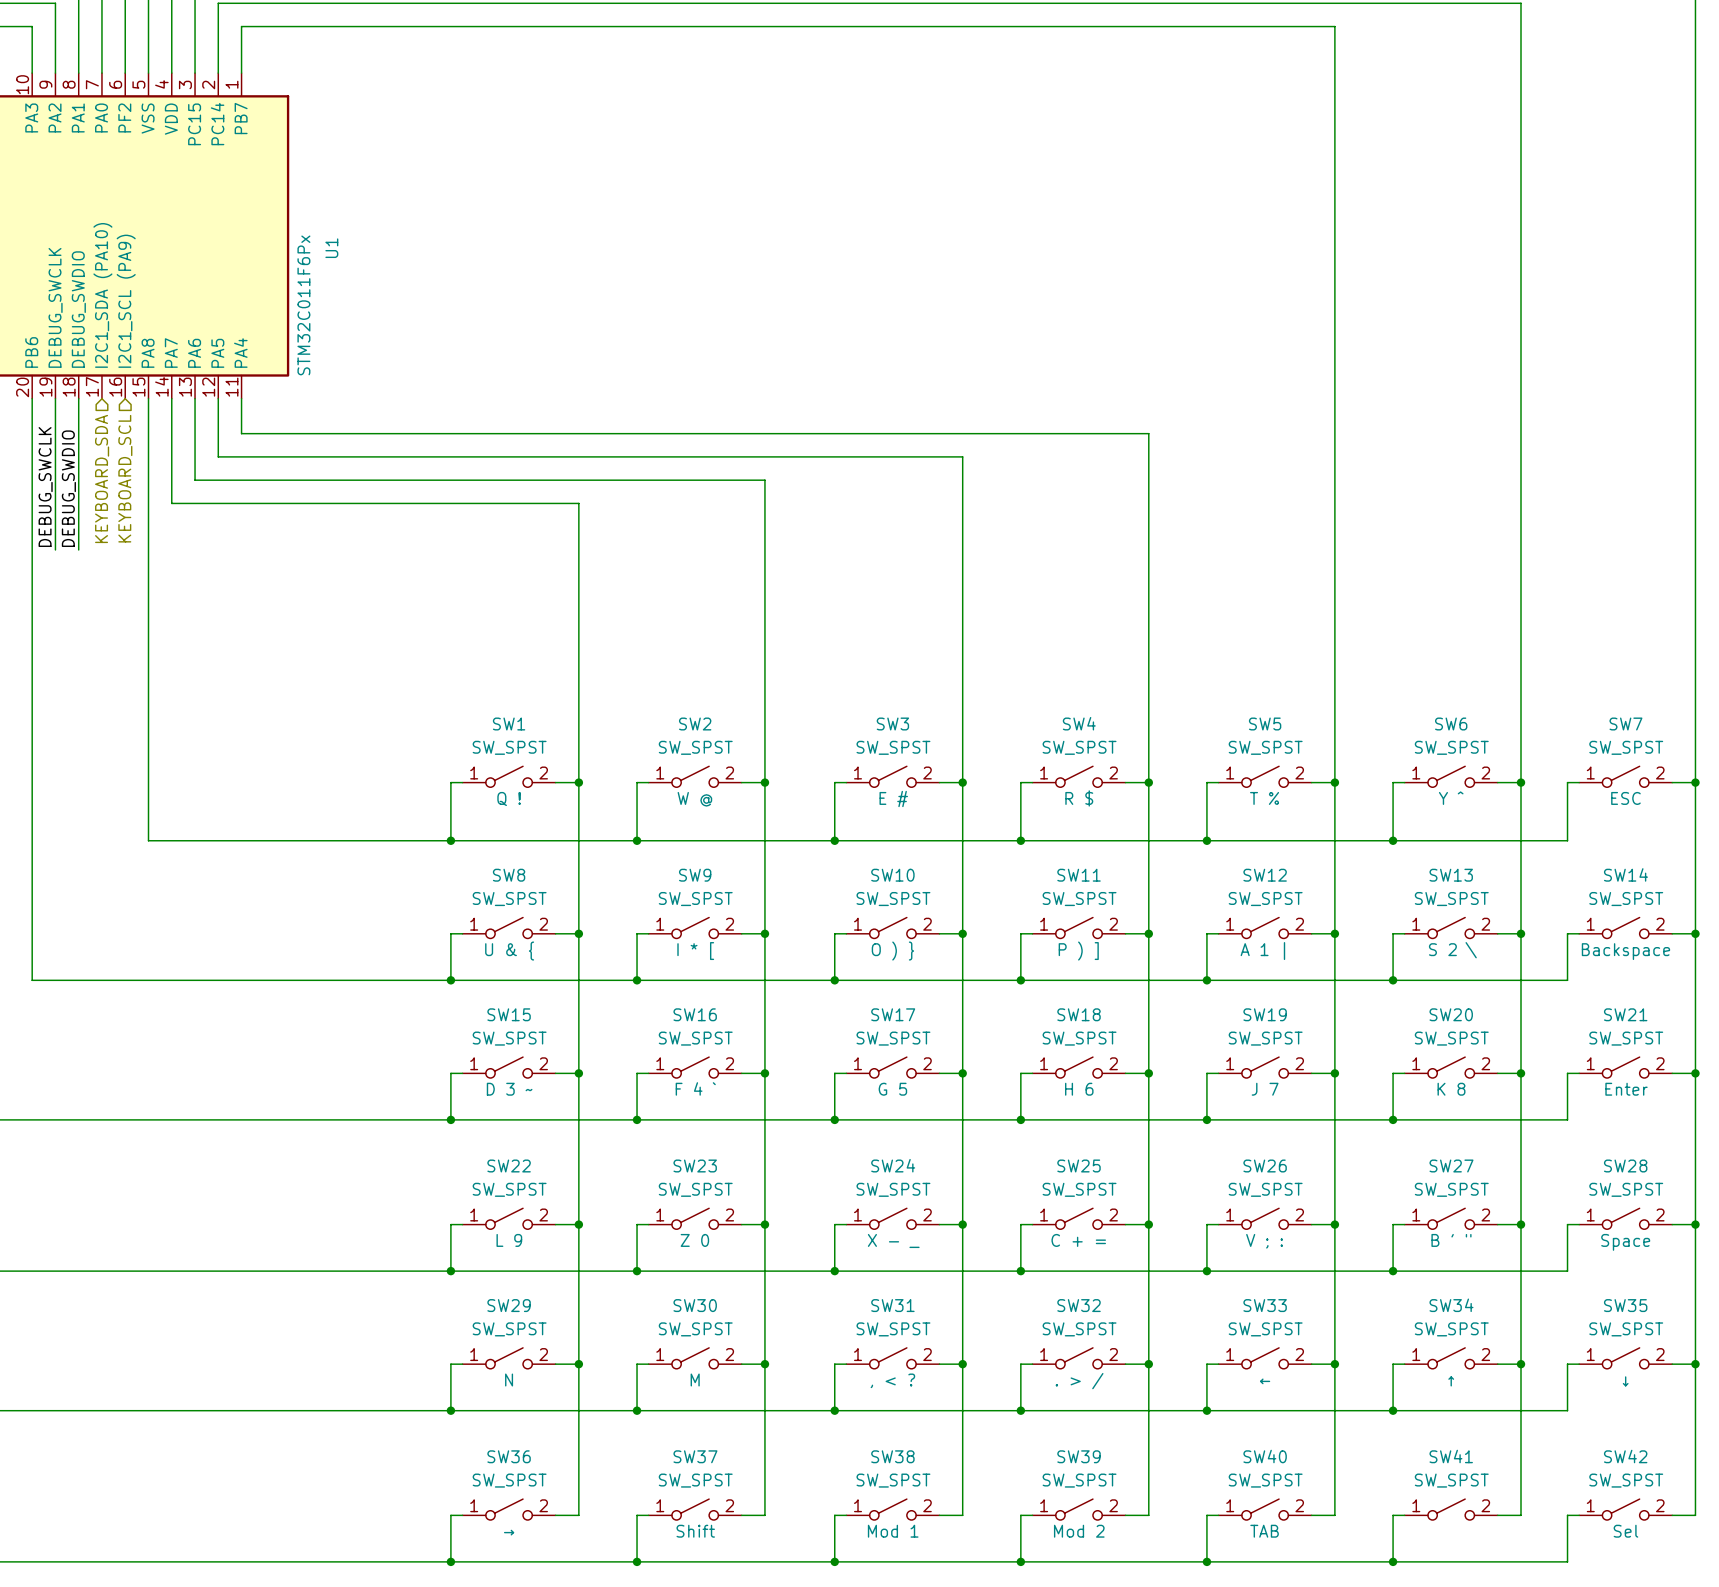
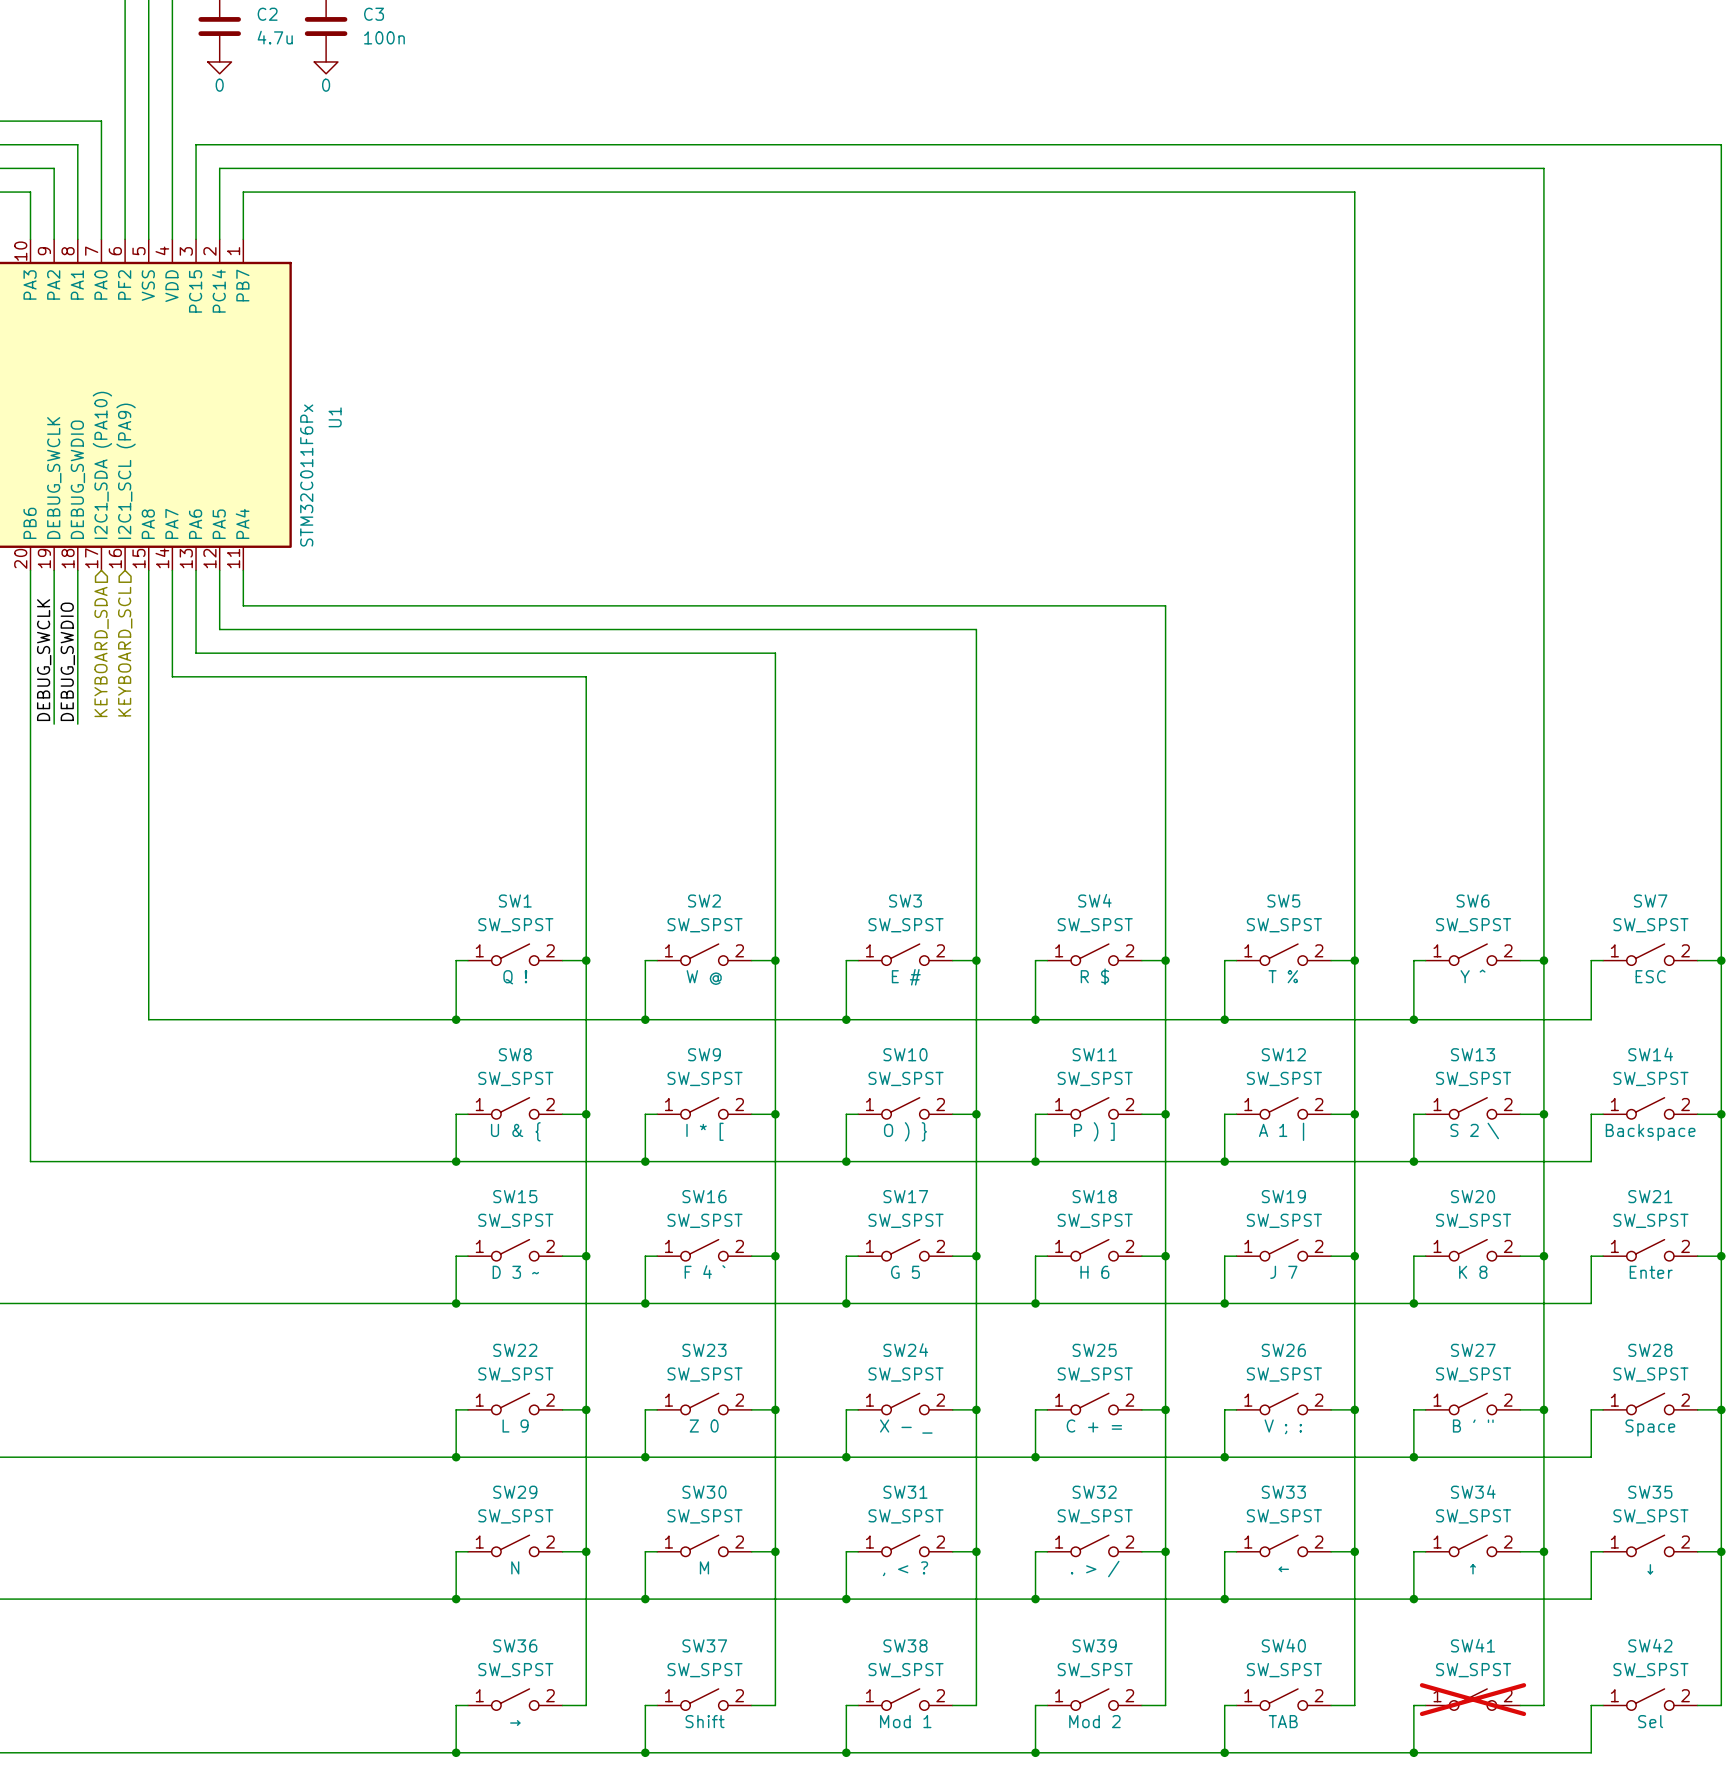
SW41 do-not-place cross: none -> (1473, 1699)

